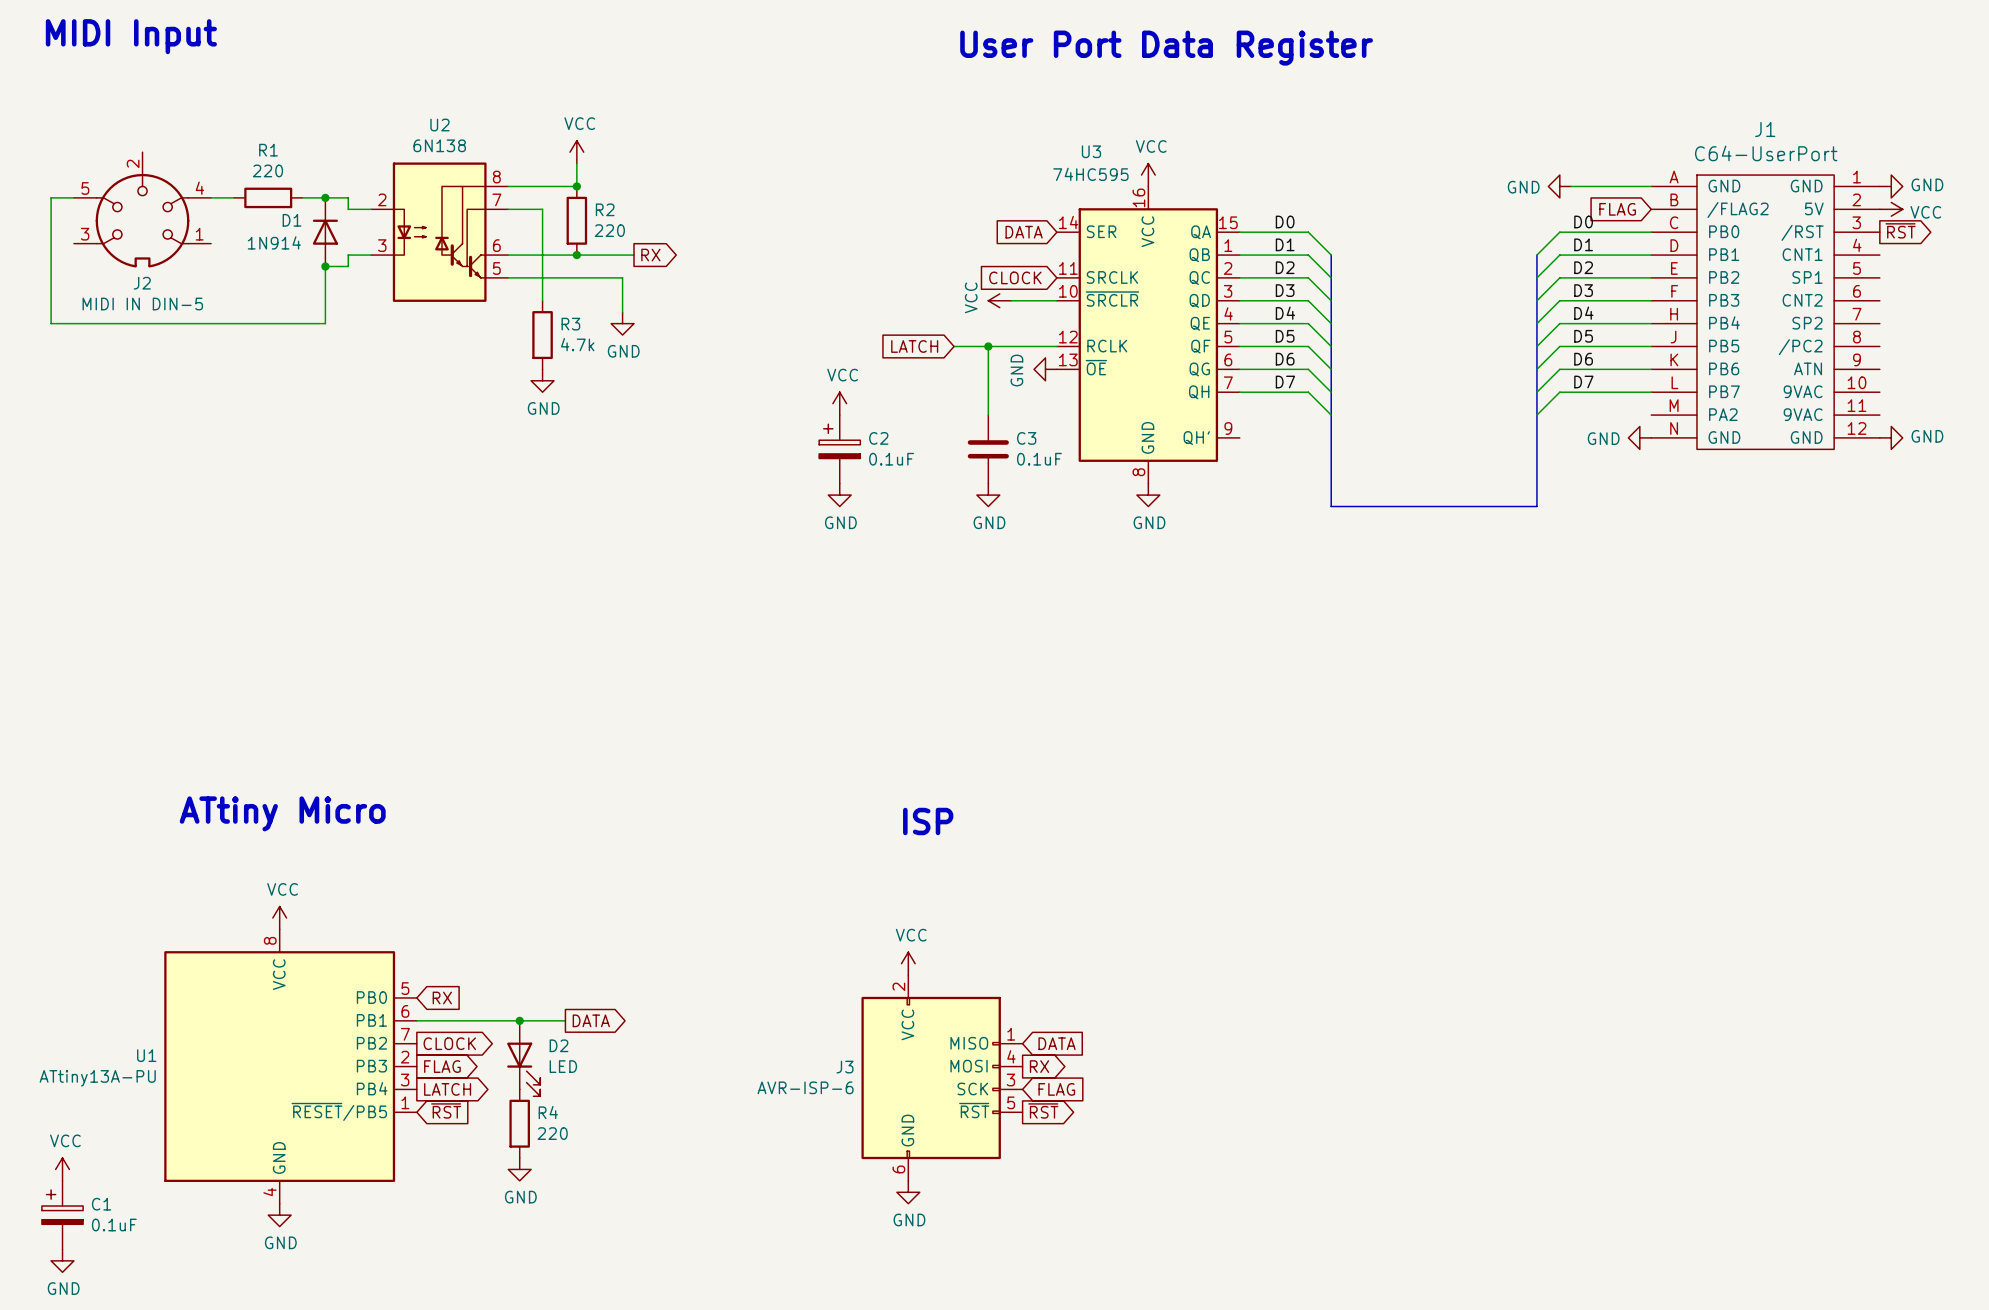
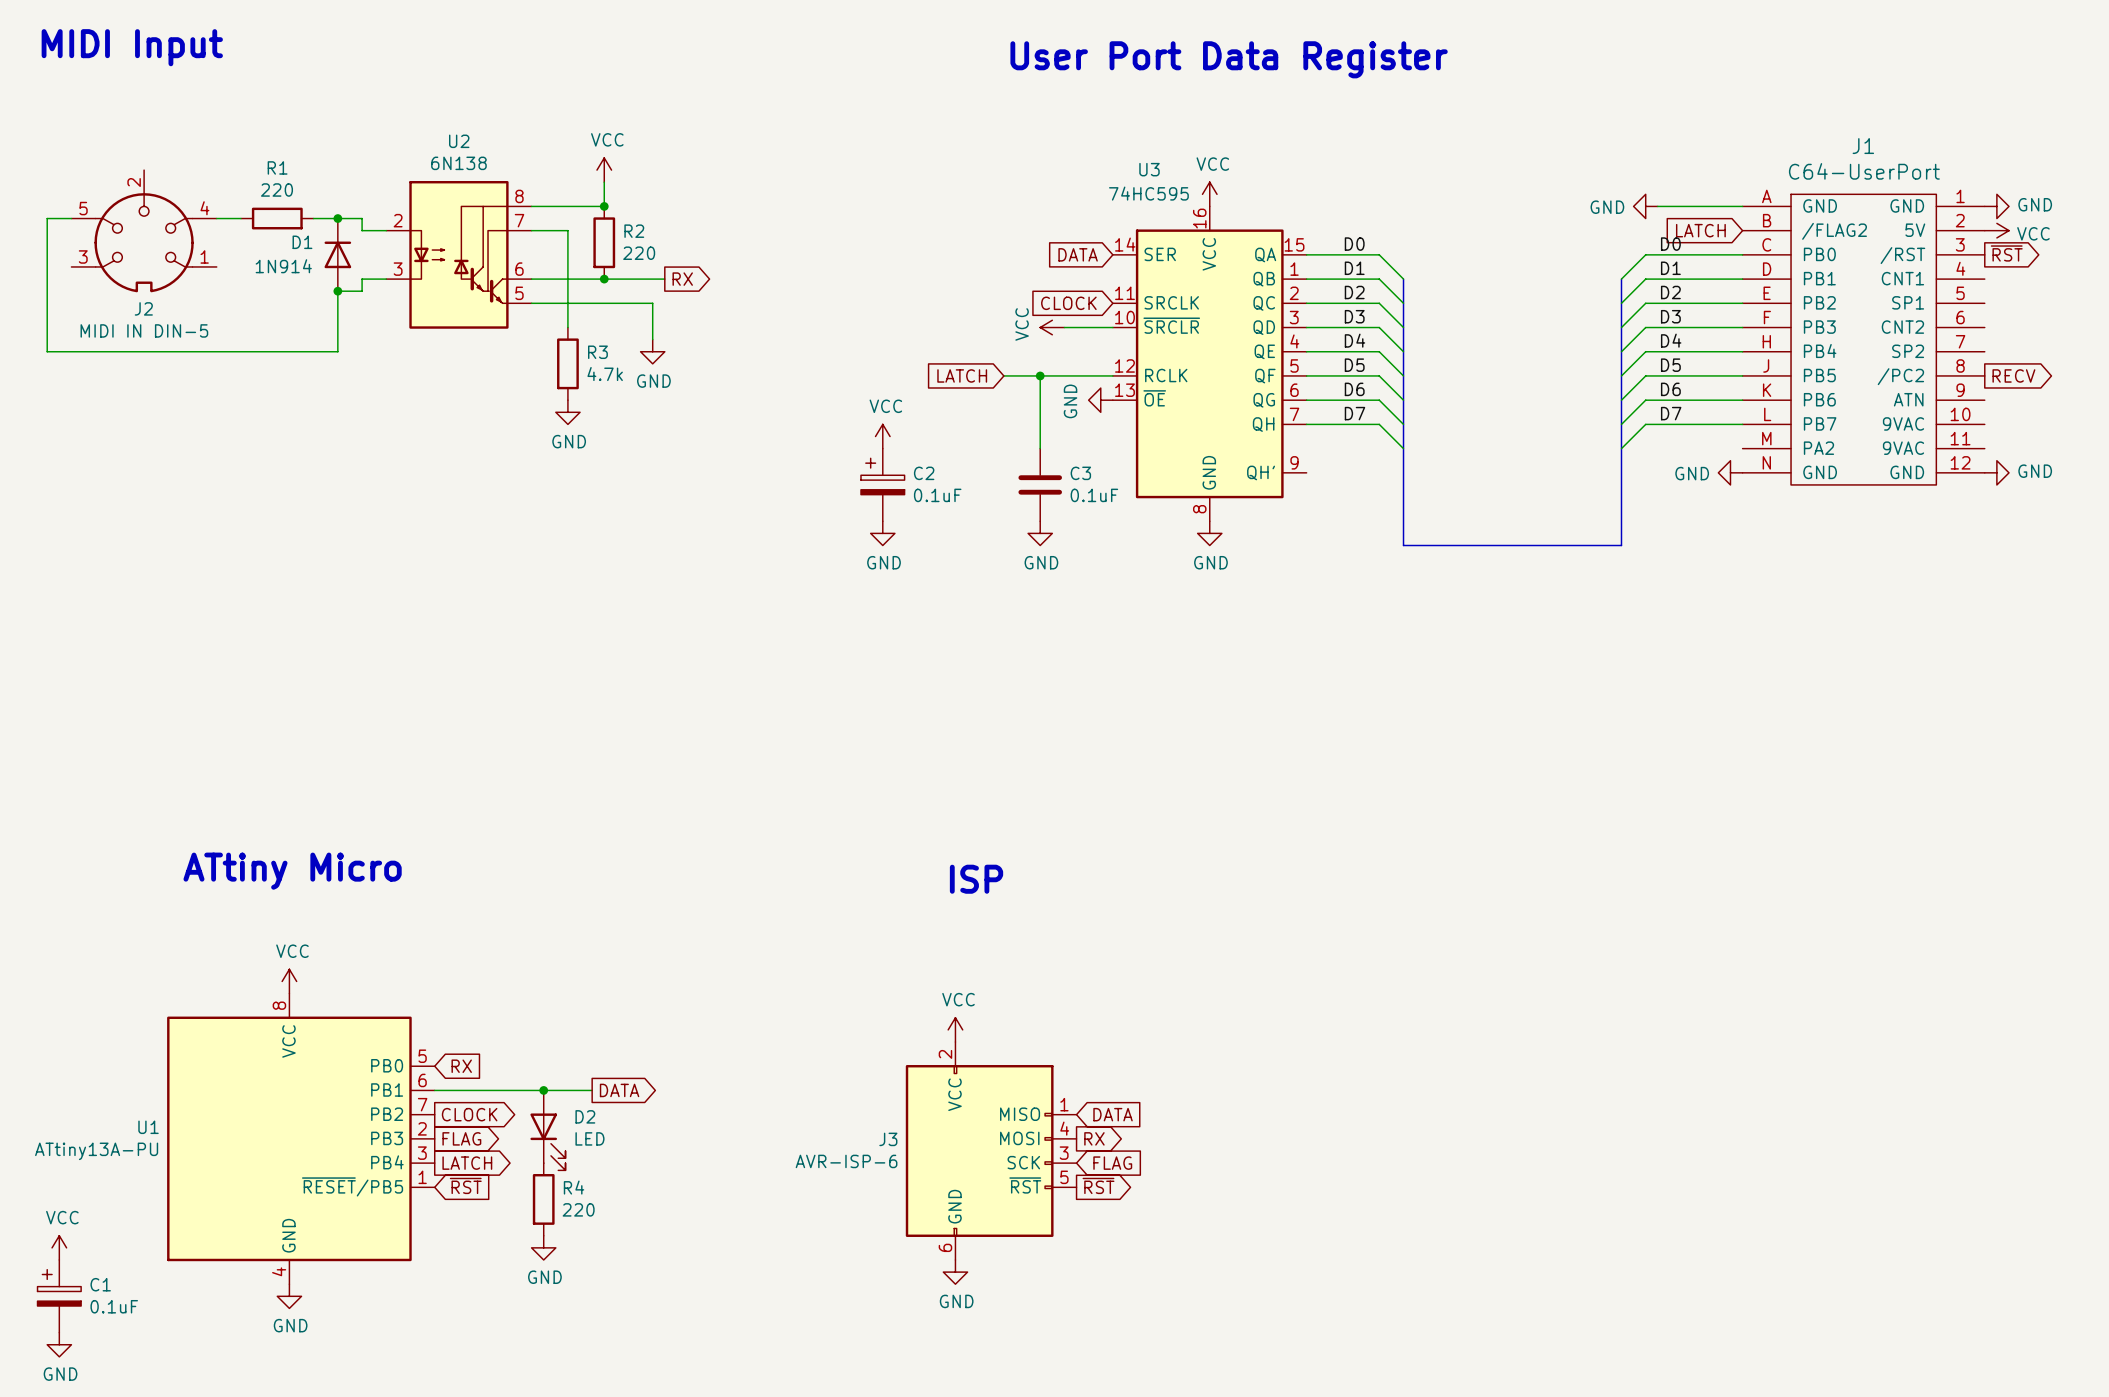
global label: FLAG (1617, 209) -> LATCH (1700, 230)
global label: none -> RECV (2013, 375)

